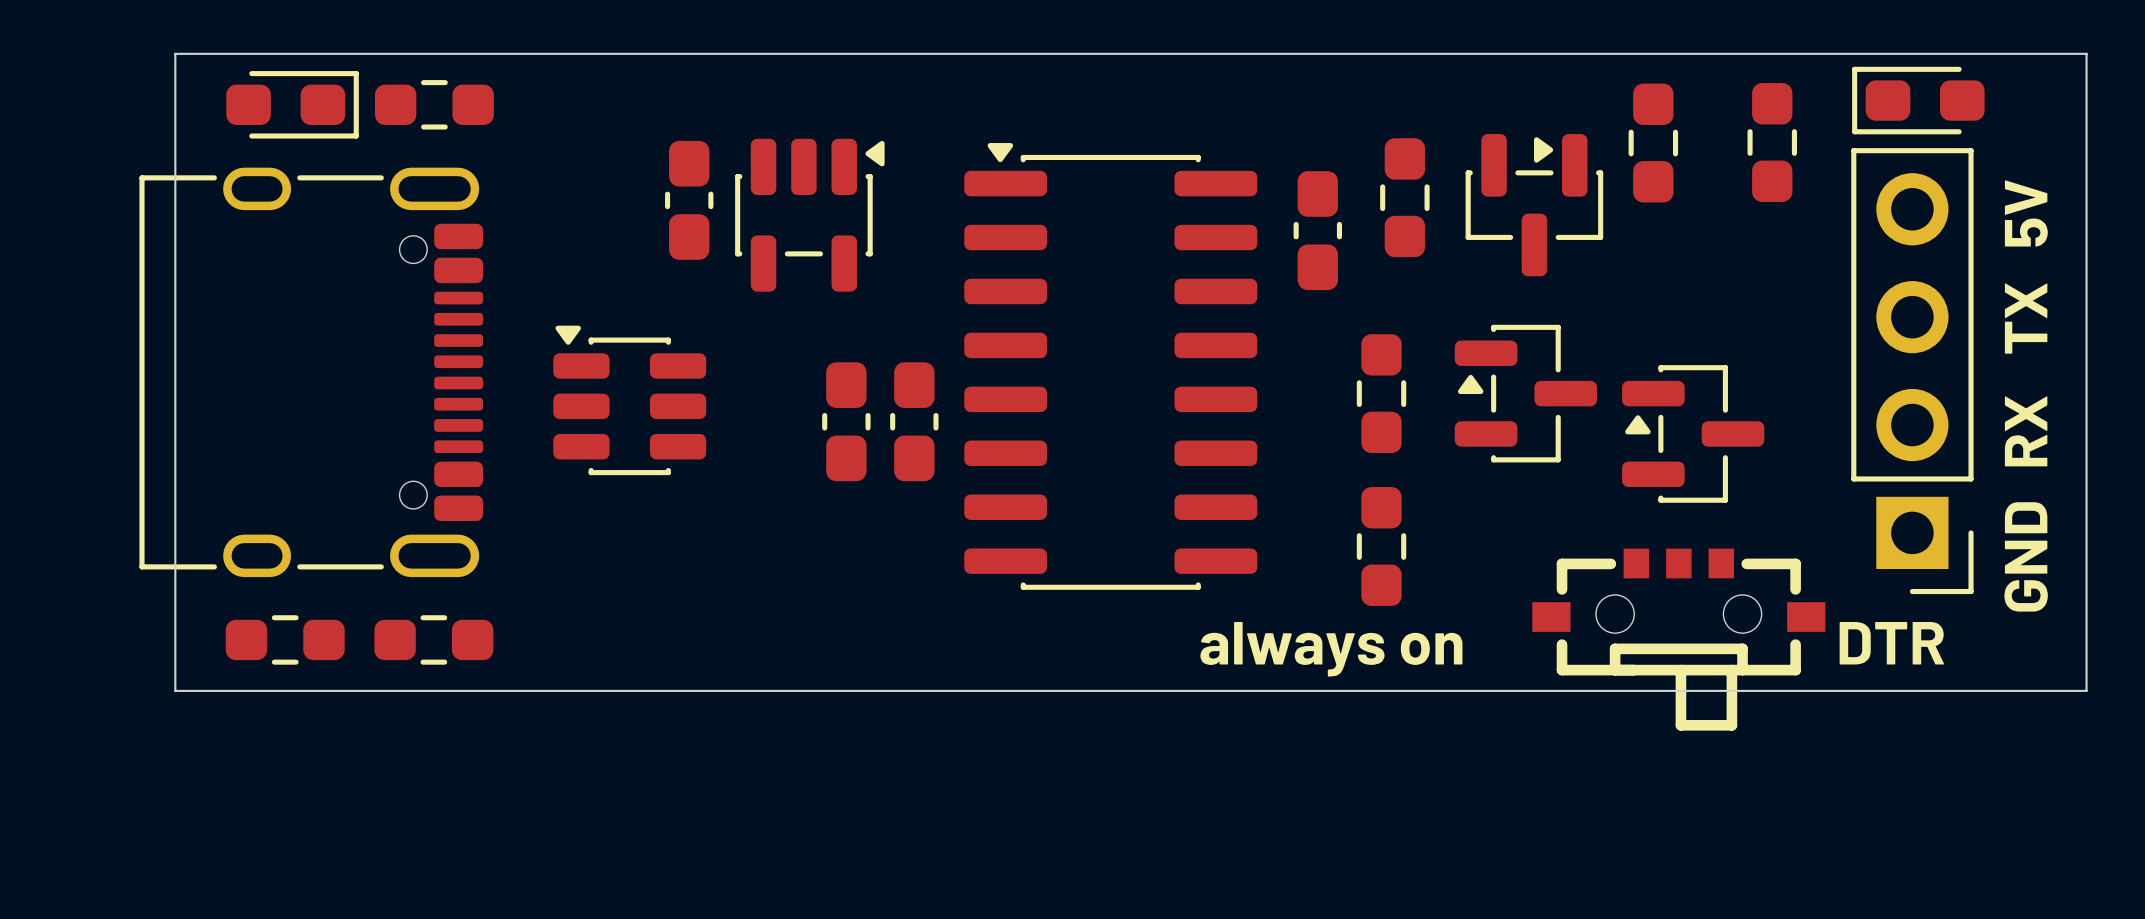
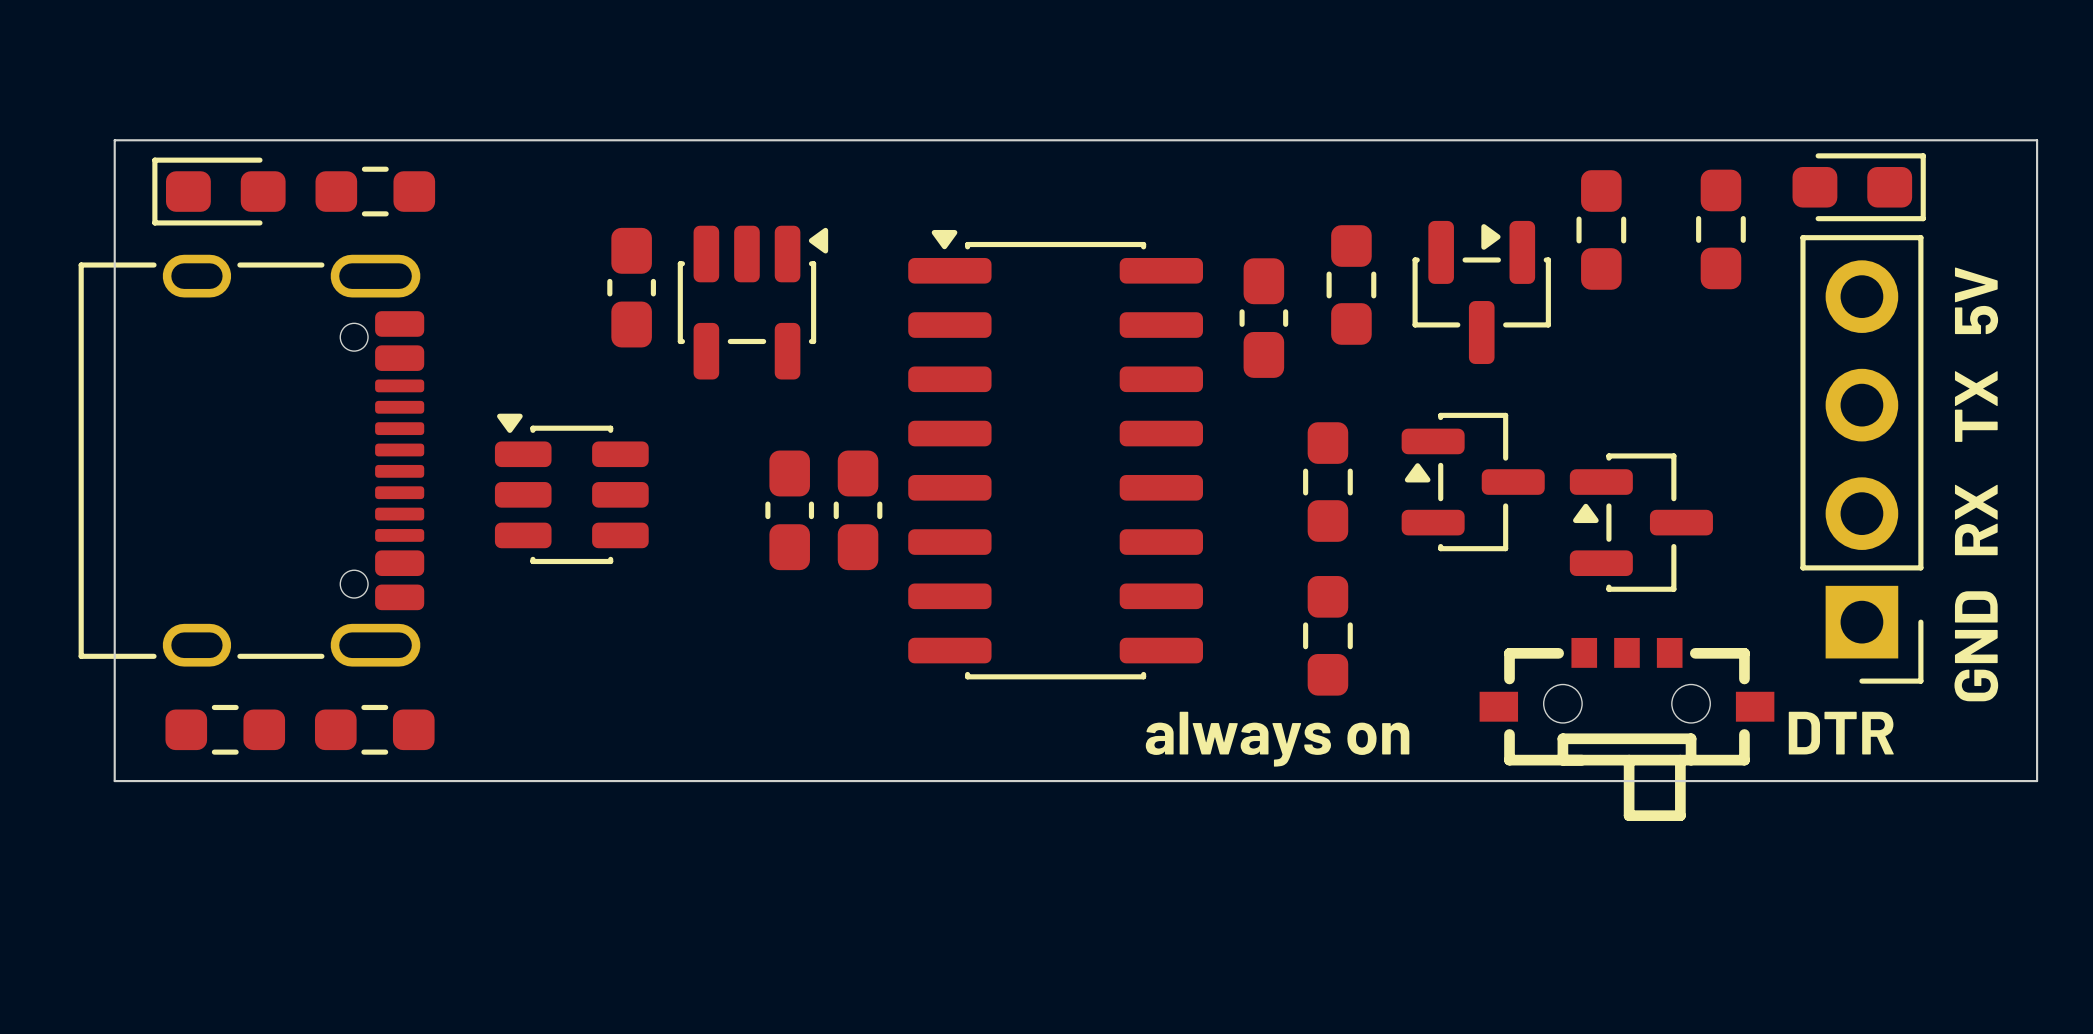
part rotation: 0° (1918, 100) -> 180° (1859, 187)
part rotation: 0° (292, 104) -> 180° (218, 191)

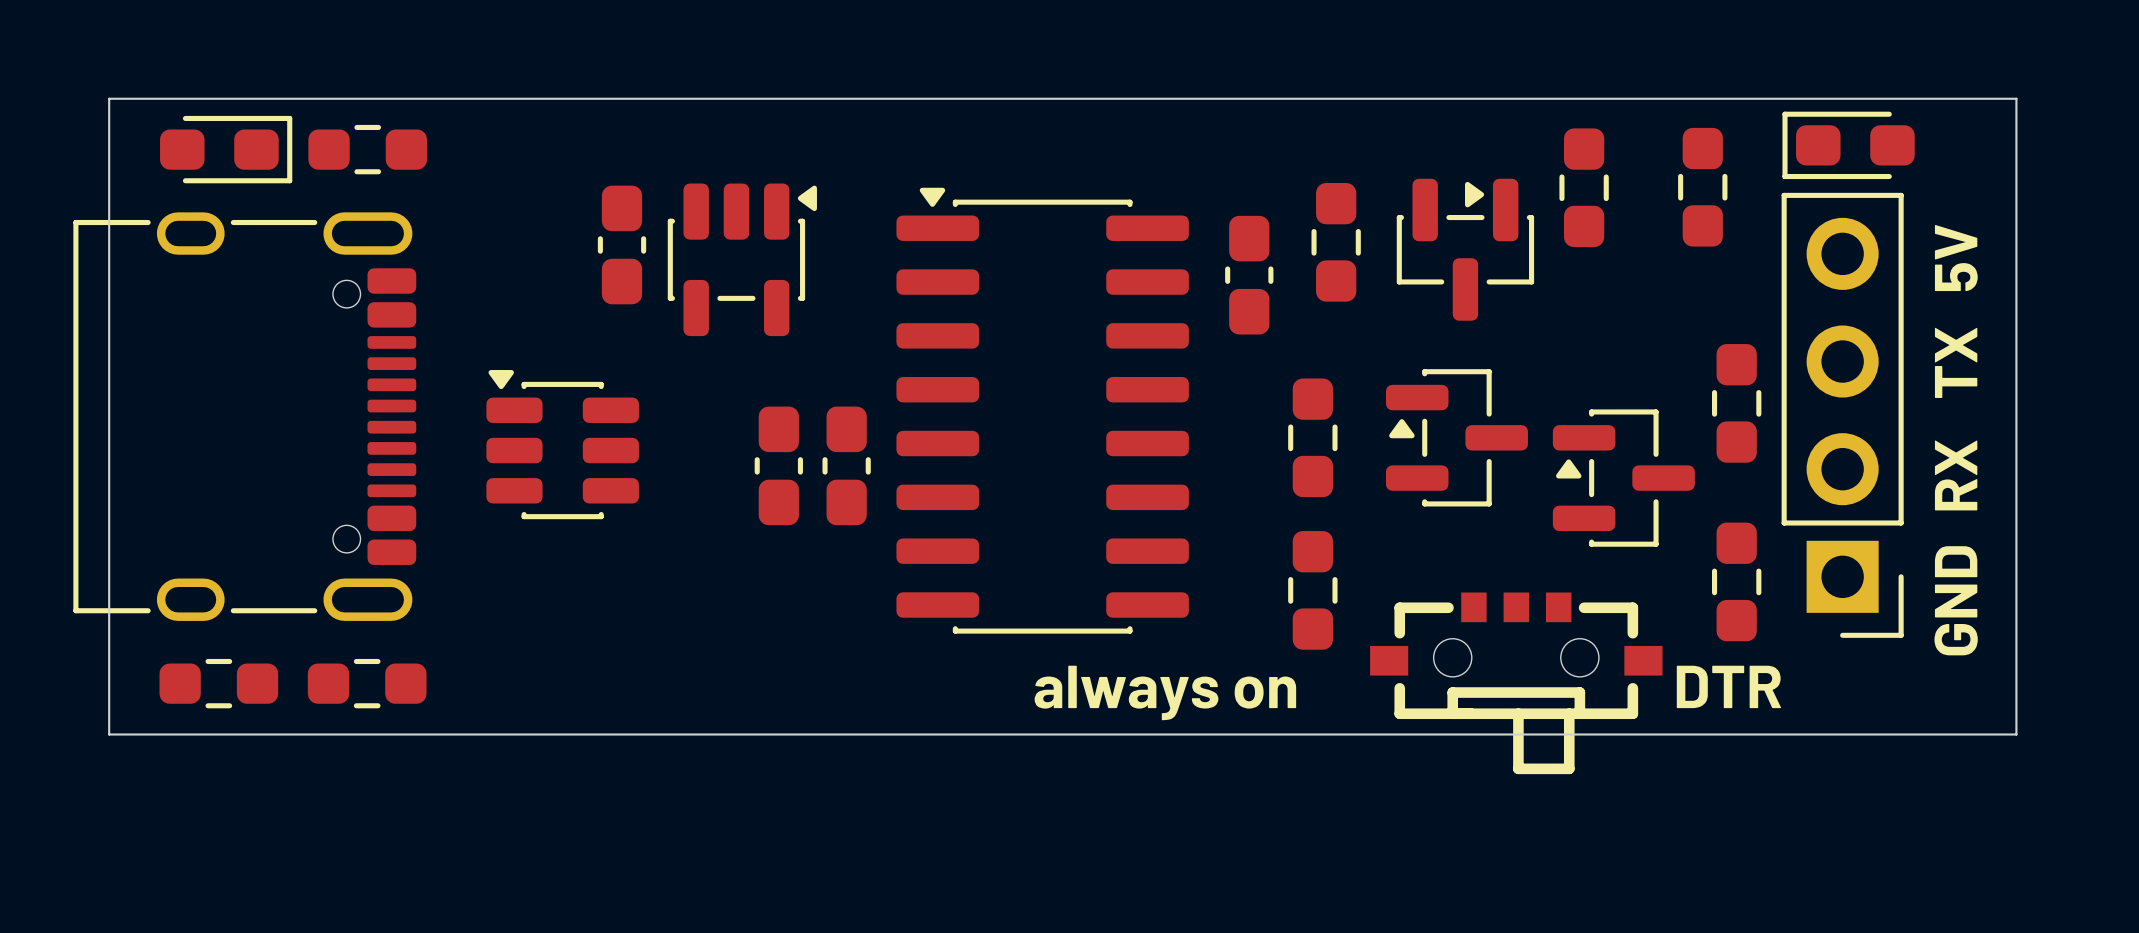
part rotation: 0° (1859, 187) -> 180° (1848, 145)
part rotation: 0° (218, 191) -> 180° (226, 149)
part: none -> (1736, 403)
part: none -> (1736, 581)
part position: (1626, 729) -> (1516, 683)
text position: DTR (1841, 733) -> DTR (1728, 686)
text position: always on (1277, 739) -> always on (1165, 692)

